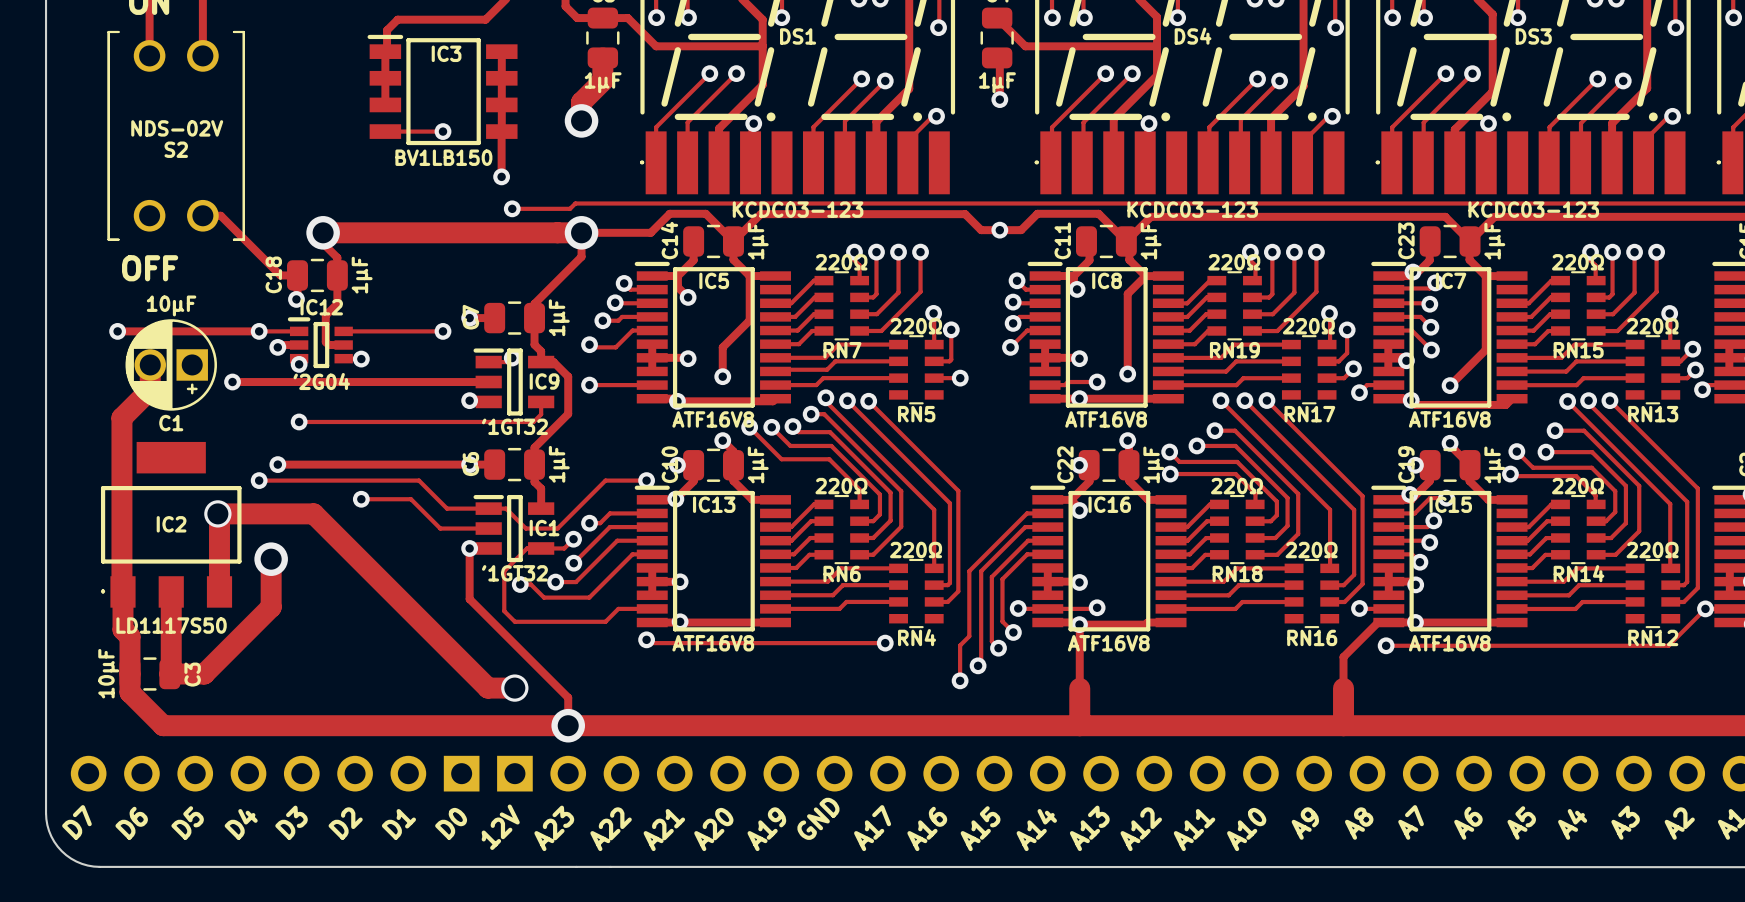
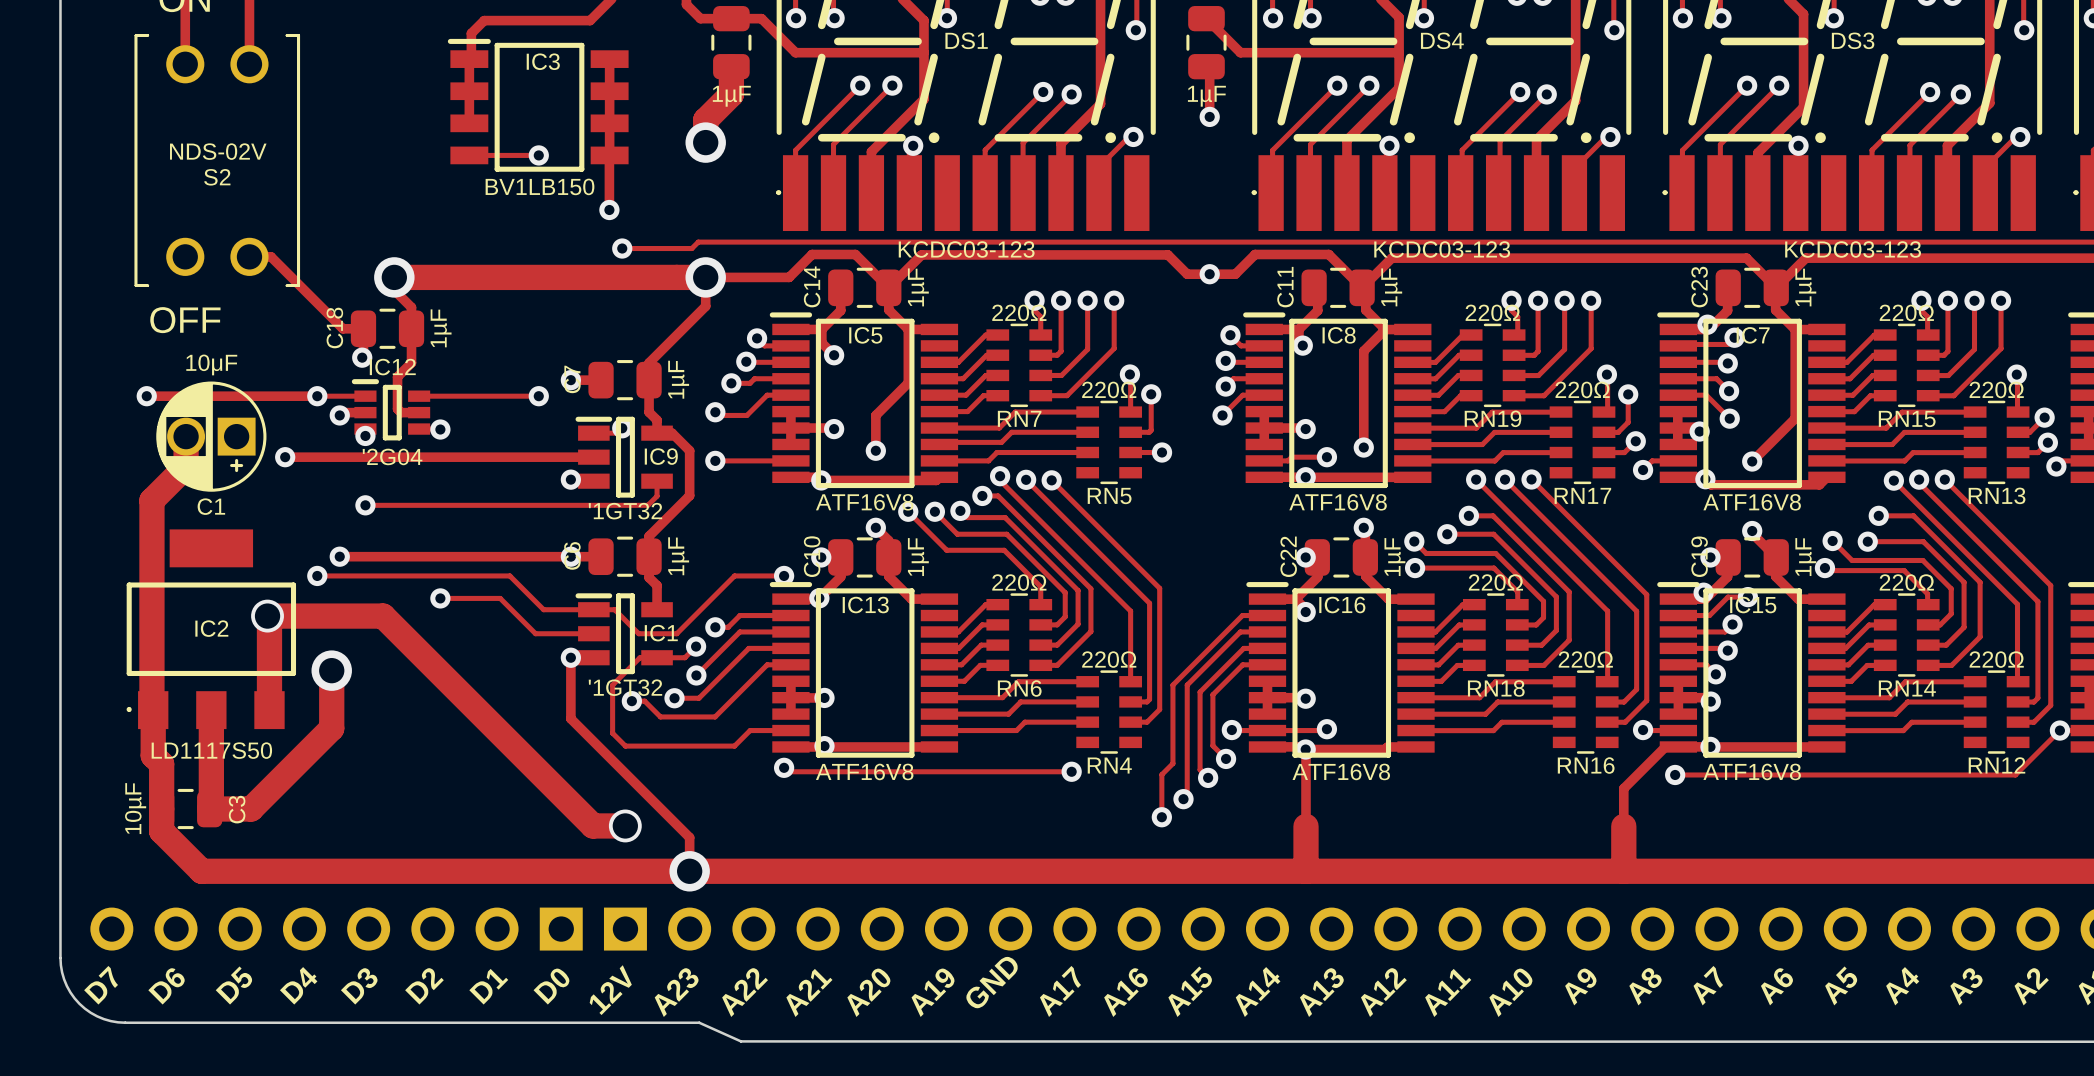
board edge: (46, 797) (47, 825) (54, 841) (71, 858) (93, 866) (610, 866) -> (60, 957) (64, 979) (74, 998) (84, 1008) (97, 1016) (118, 1022) (699, 1022) (741, 1041)

